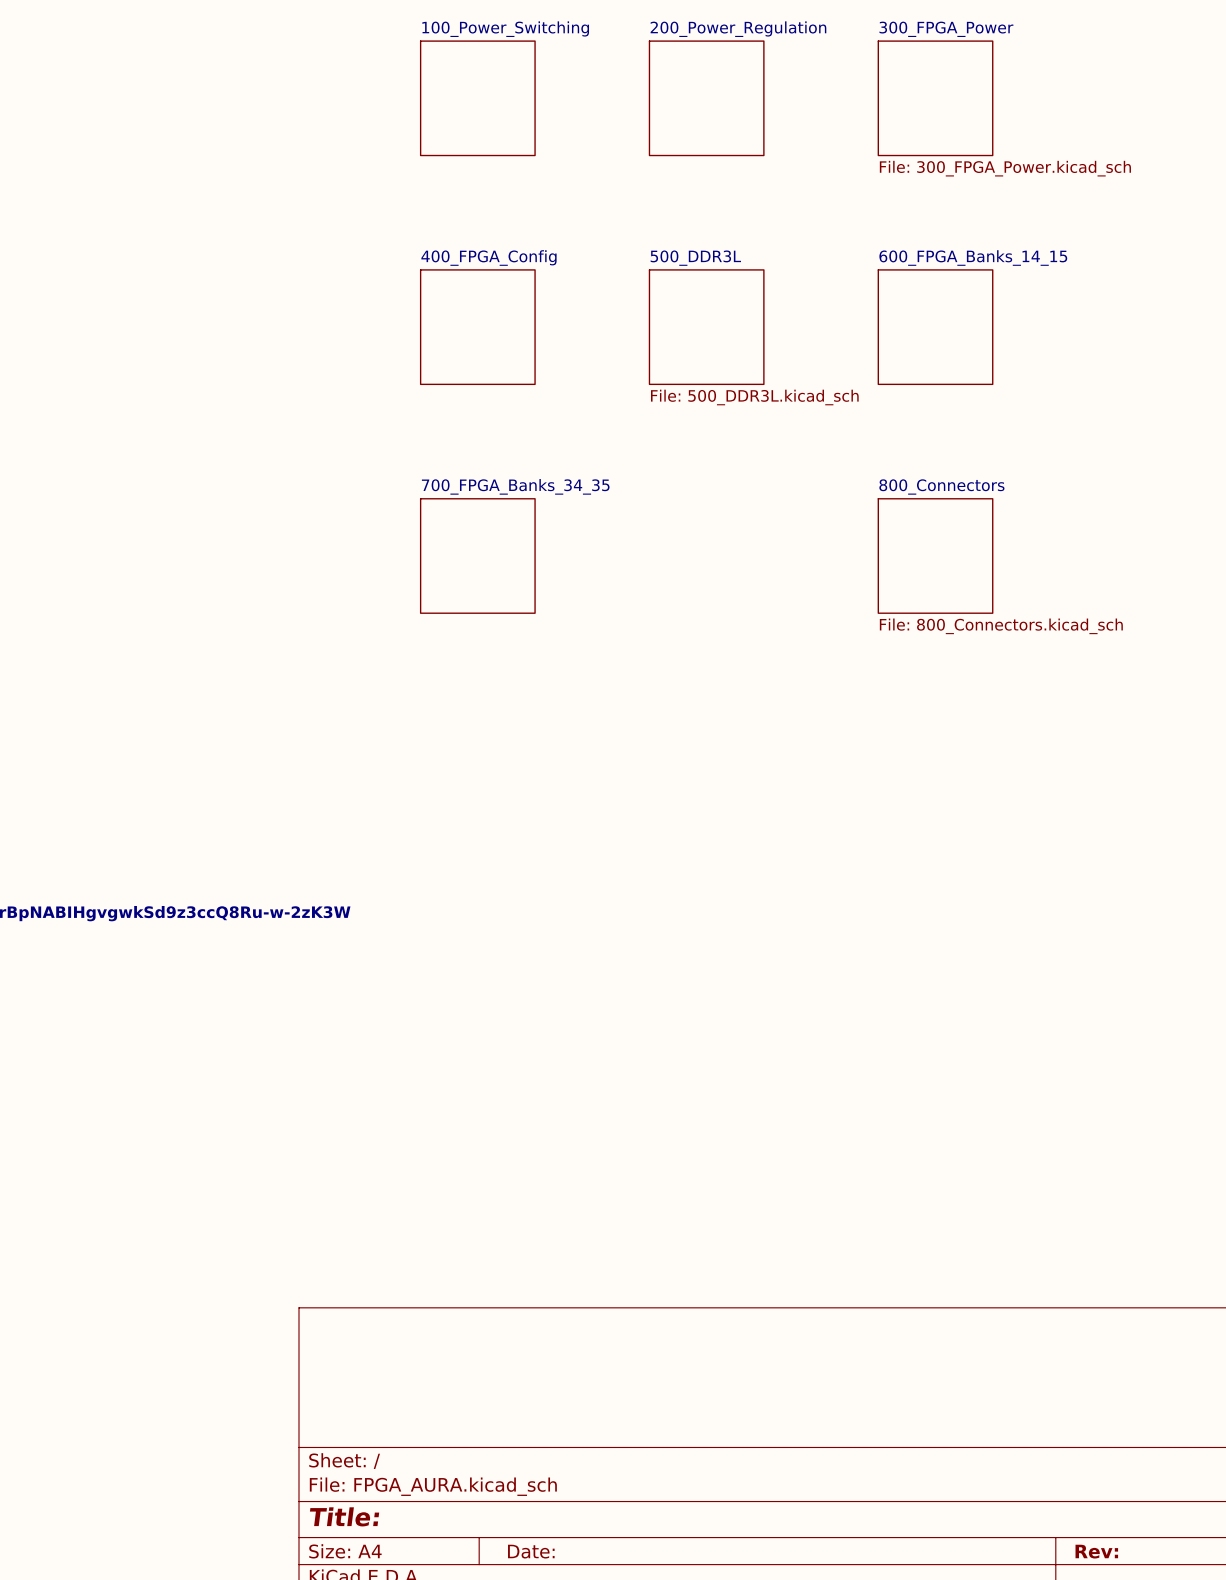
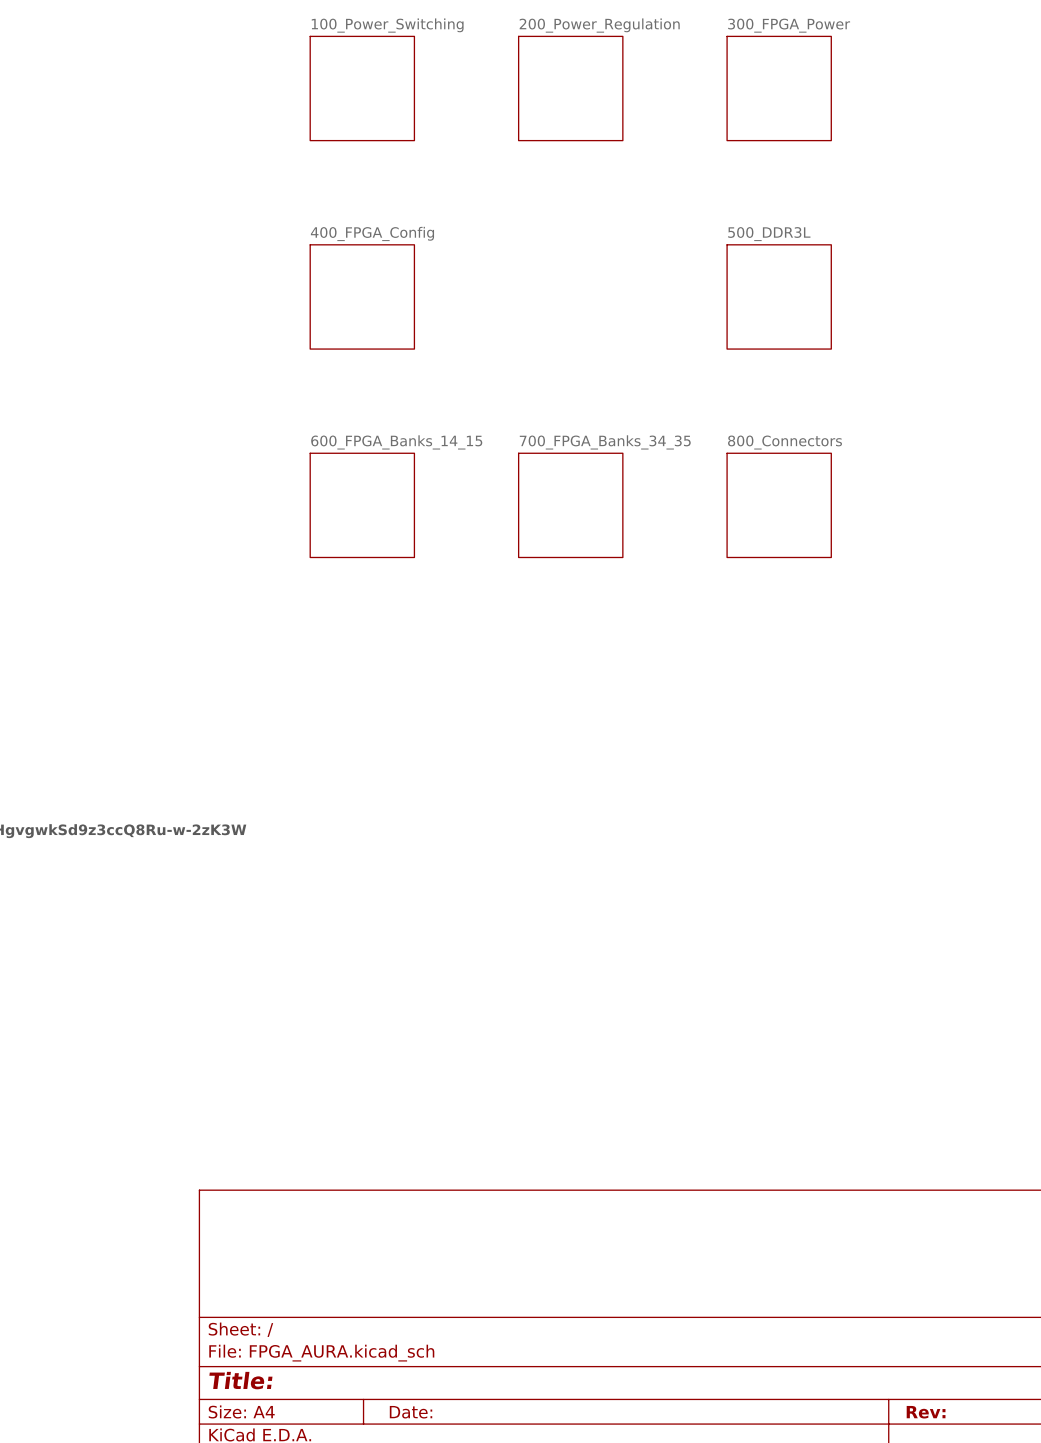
sheet 300_FPGA_Power value: File: 300_FPGA_Power.kicad_sch (1005, 168) -> none
sheet 600_FPGA_Banks_14_15 name: 600_FPGA_Banks_14_15 (973, 258) -> 500_DDR3L (769, 234)
sheet 500_DDR3L: File: 500_DDR3L.kicad_sch (706, 327) -> none
sheet 700_FPGA_Banks_34_35 name: 700_FPGA_Banks_34_35 (515, 486) -> 600_FPGA_Banks_14_15 (396, 442)
sheet 700_FPGA_Banks_34_35: none -> (570, 505)
sheet 800_Connectors value: File: 800_Connectors.kicad_sch (1001, 626) -> none

